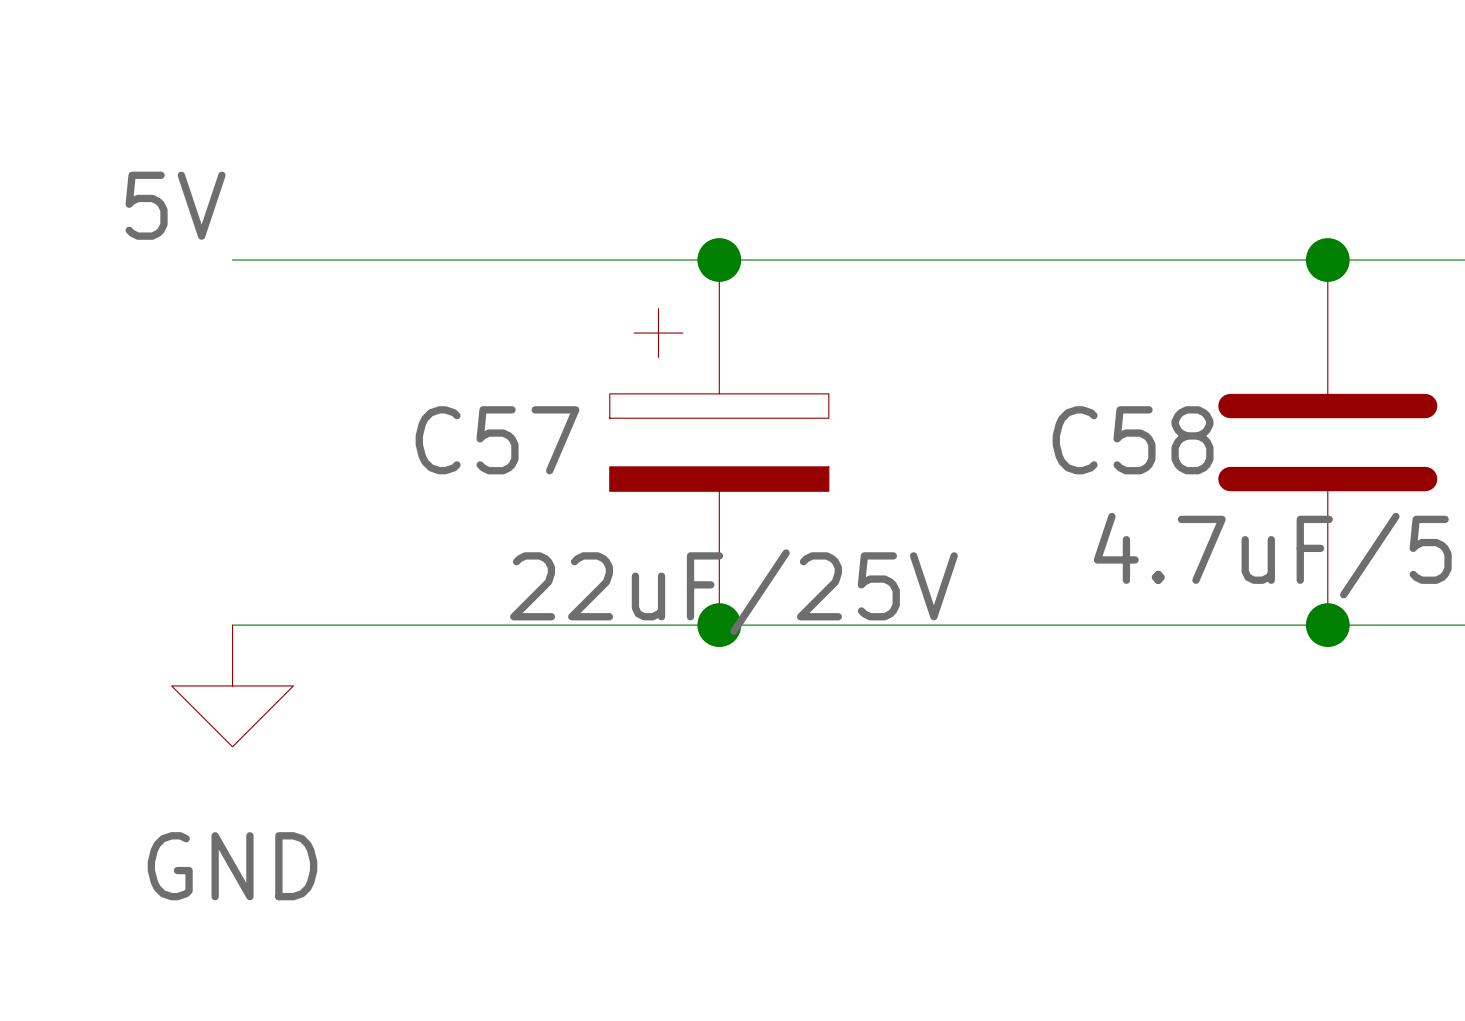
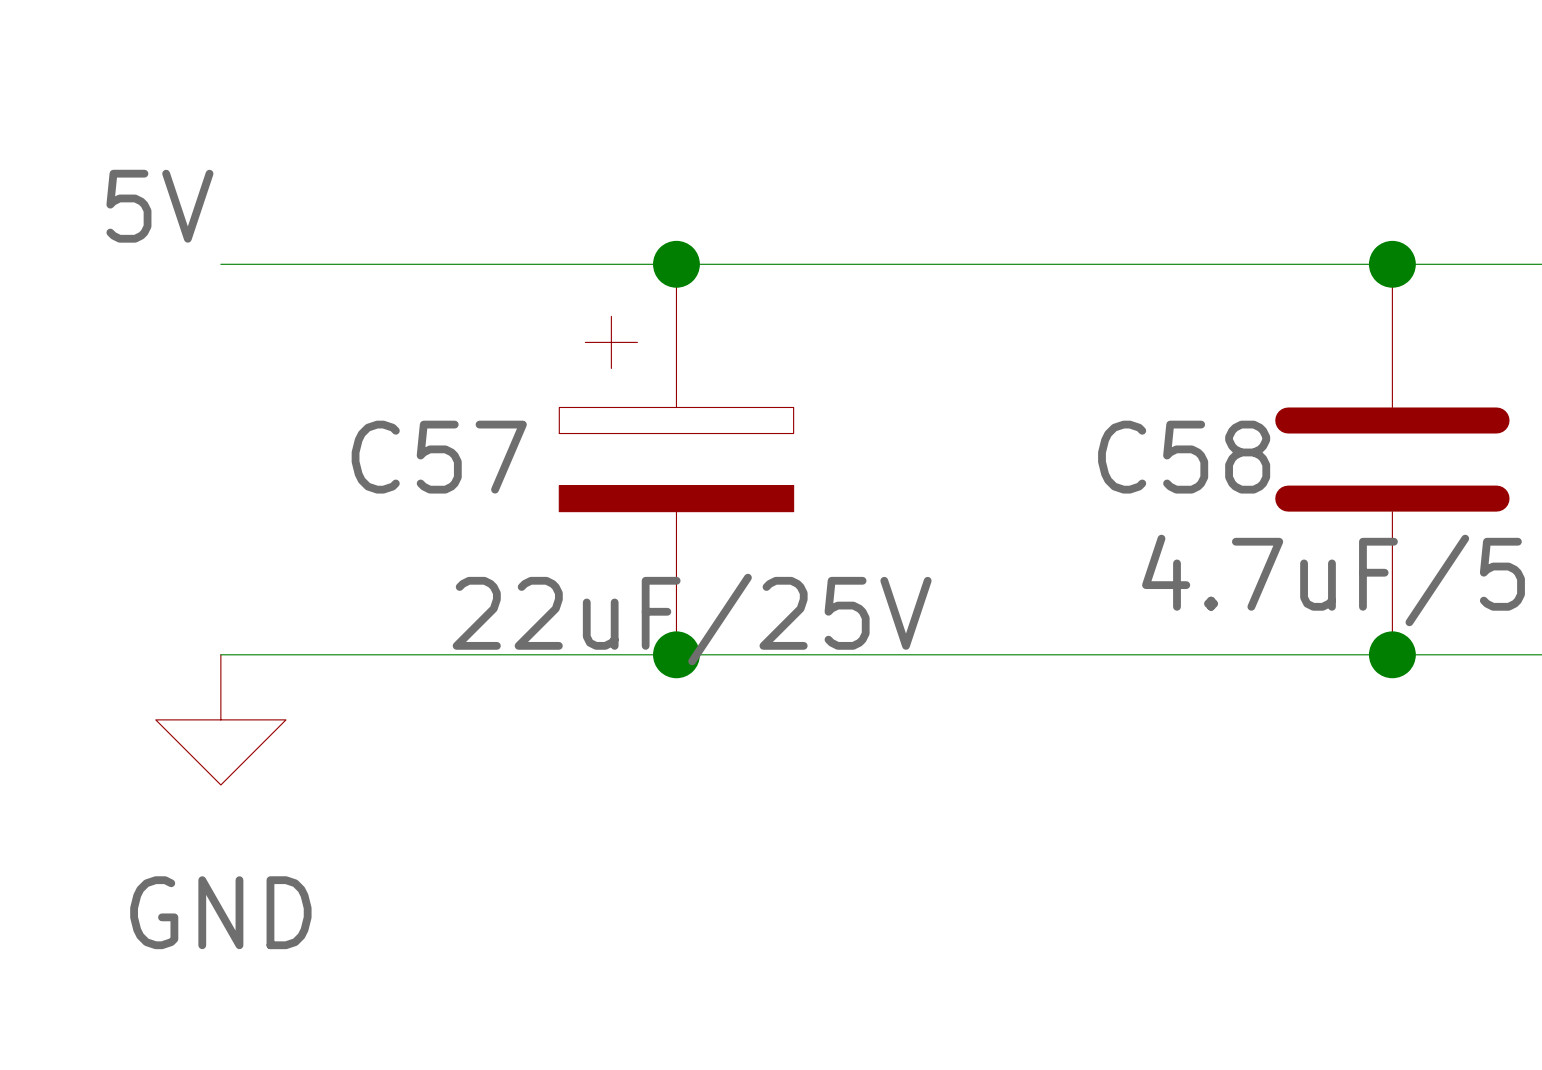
junction position: (719, 260) -> (676, 264)
C57 position: (719, 442) -> (676, 459)
junction position: (719, 625) -> (676, 654)

